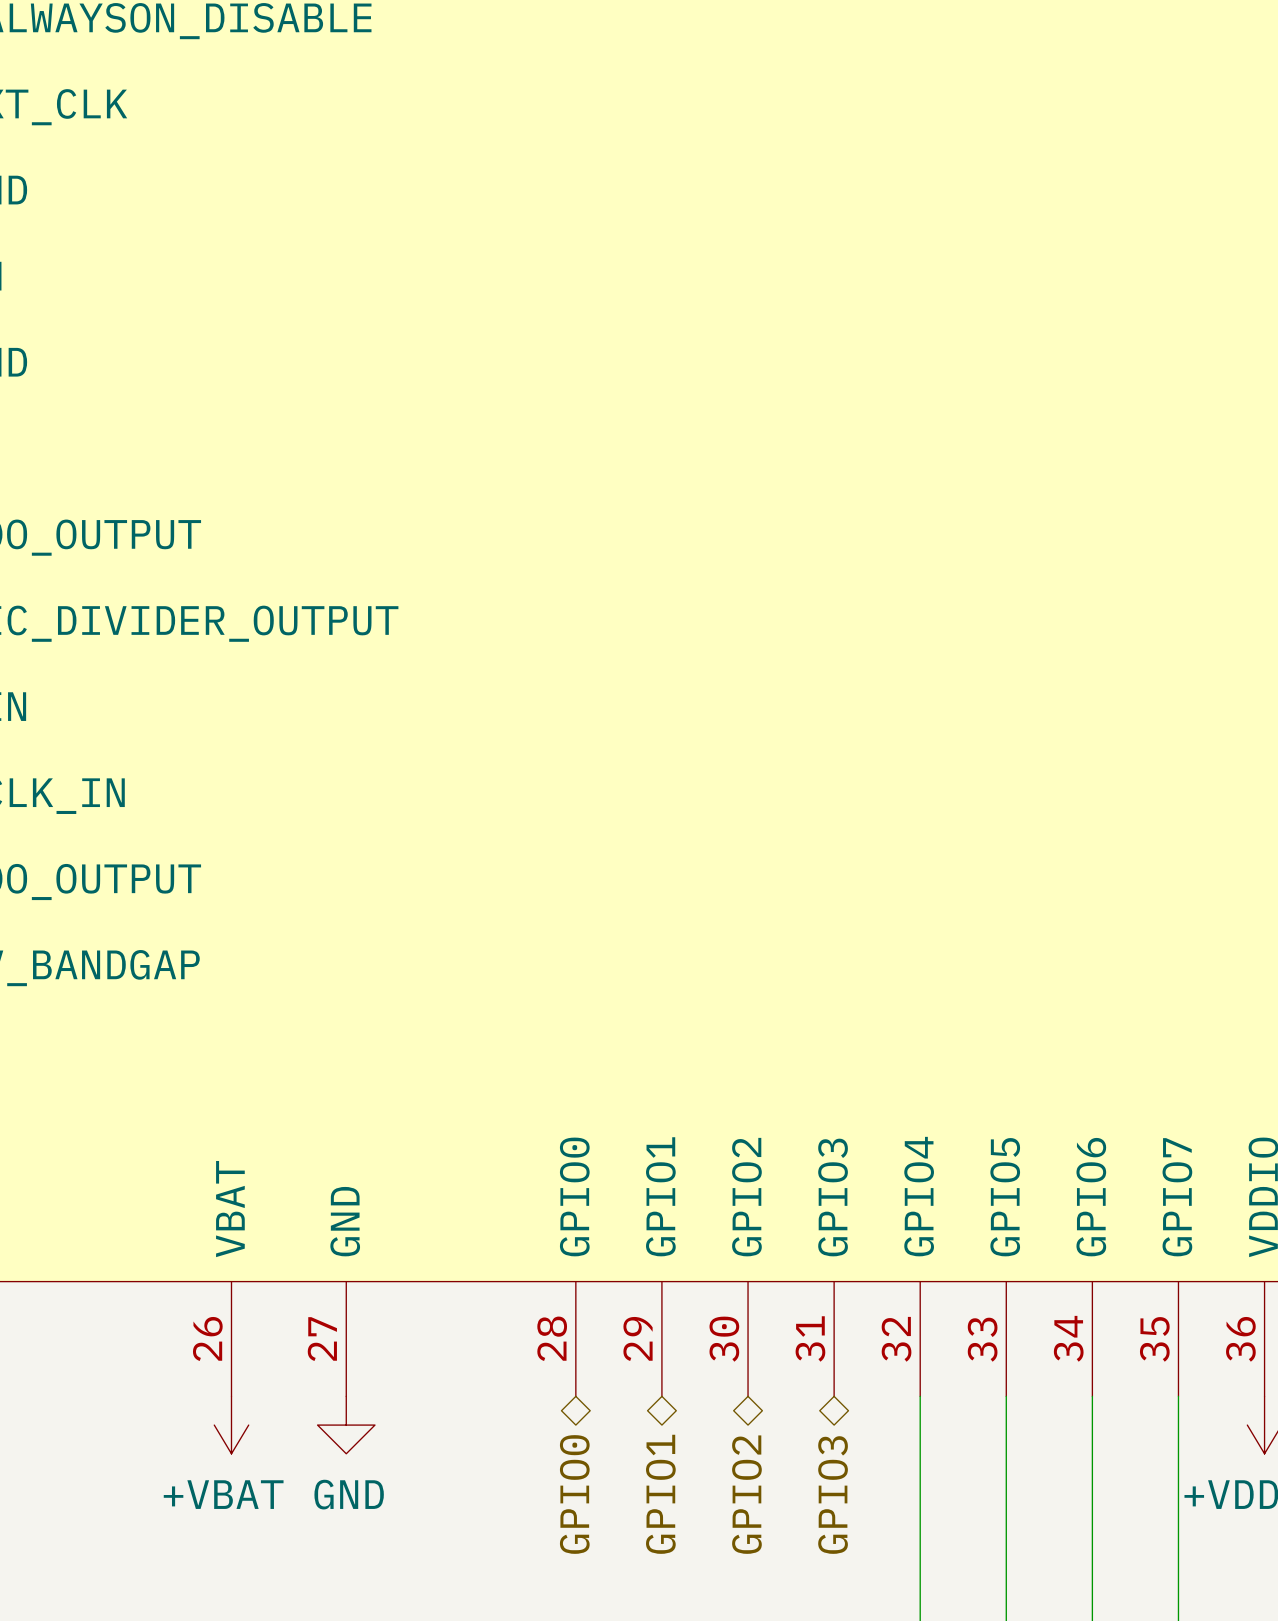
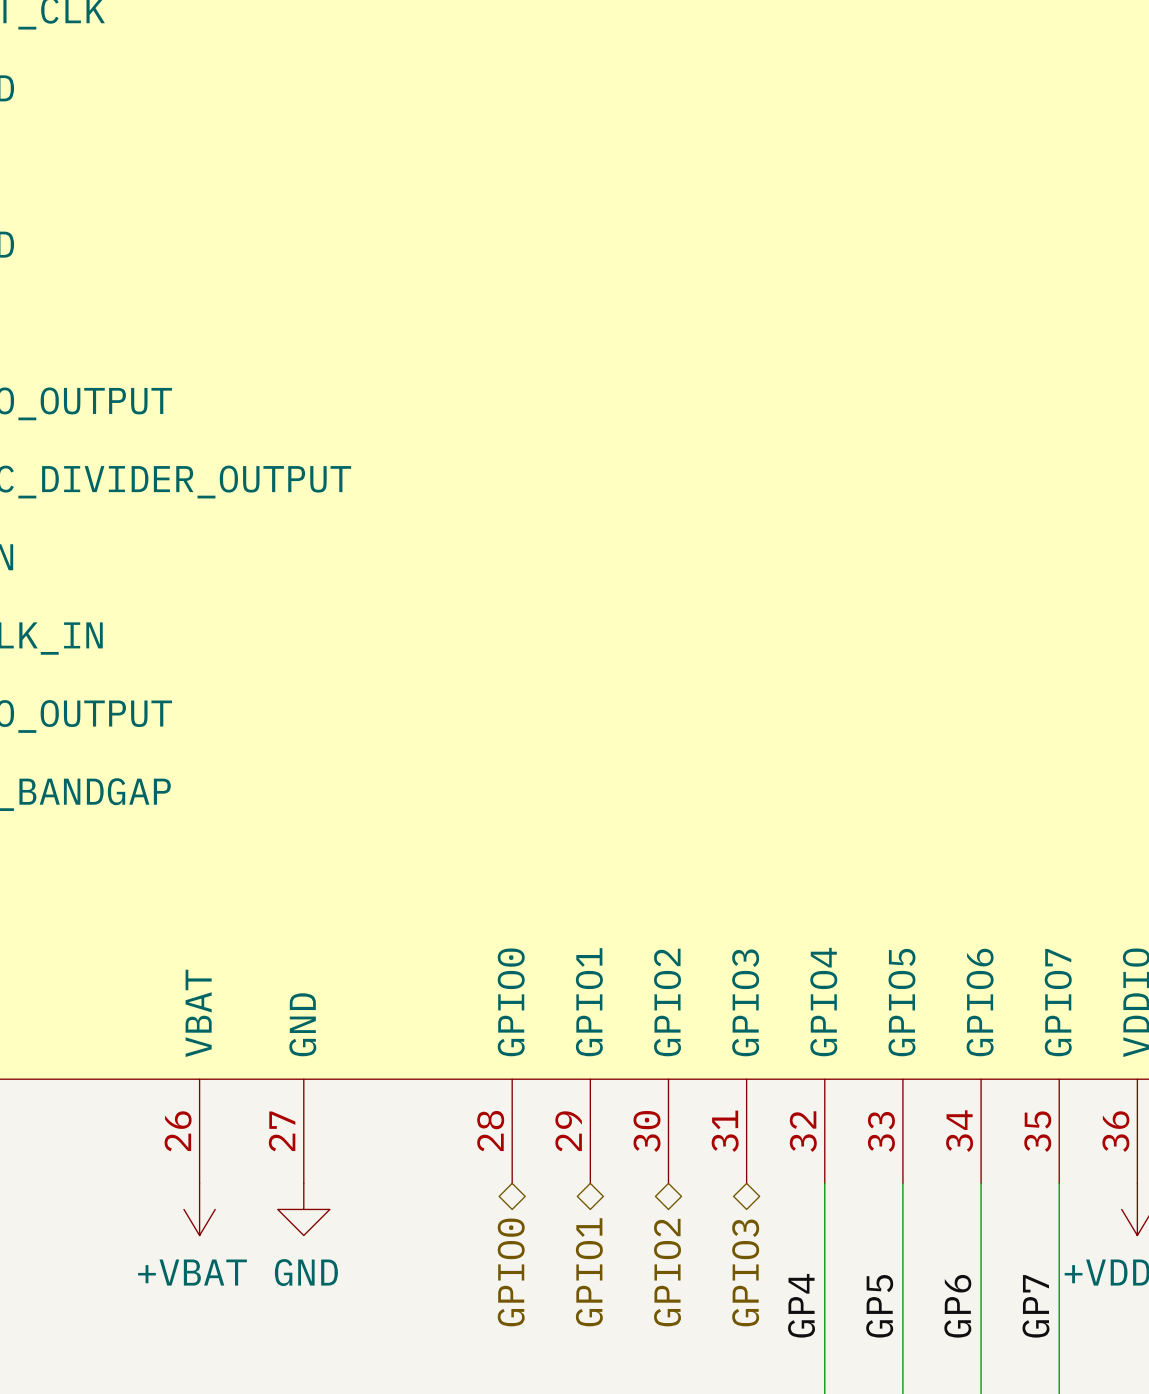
label: none -> GP4 (801, 1305)
label: none -> GP5 (879, 1306)
label: none -> GP6 (957, 1306)
label: none -> GP7 (1035, 1306)

